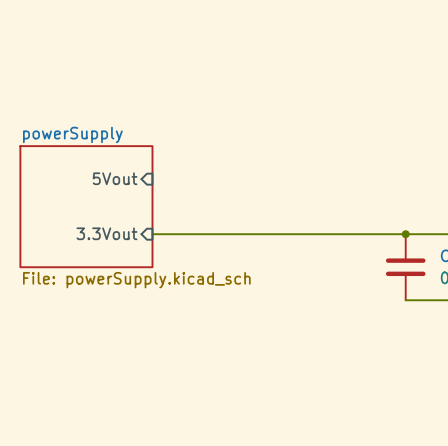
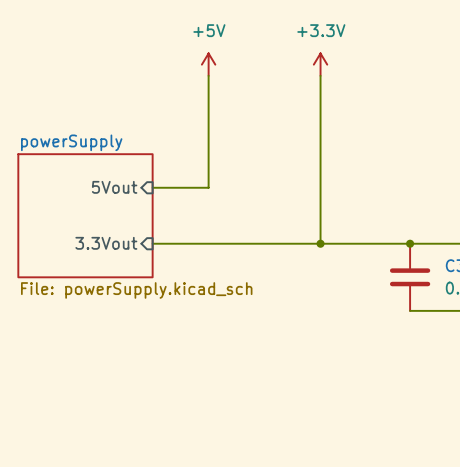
power symbol: none -> +5V (208, 64)
power symbol: none -> +3.3V (320, 64)
wire: none -> (208, 75) (208, 187) (152, 187)
wire: none -> (320, 75) (320, 243)
junction: none -> (320, 243)

